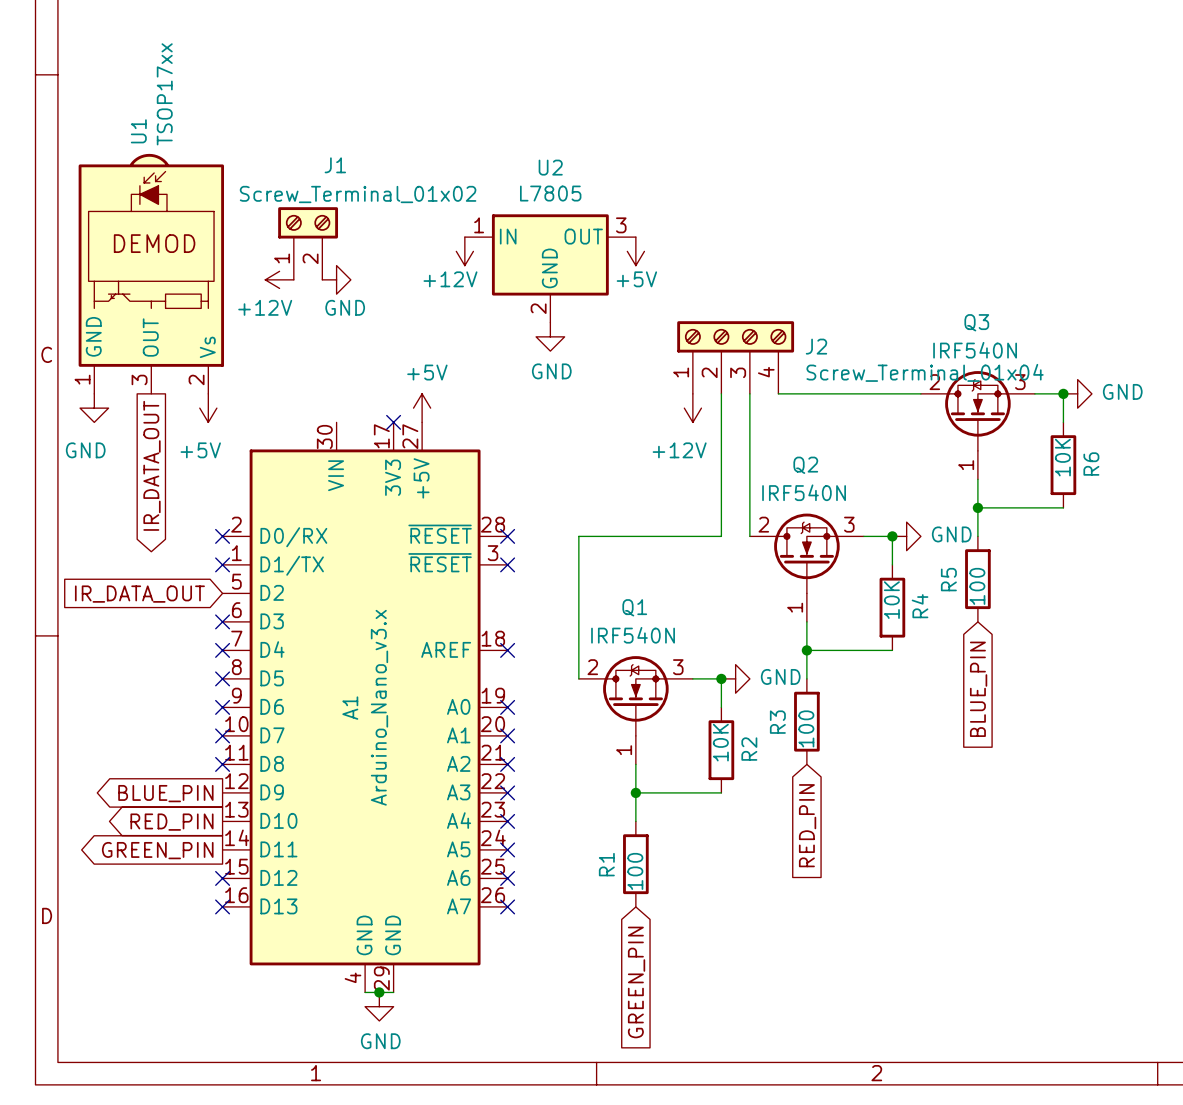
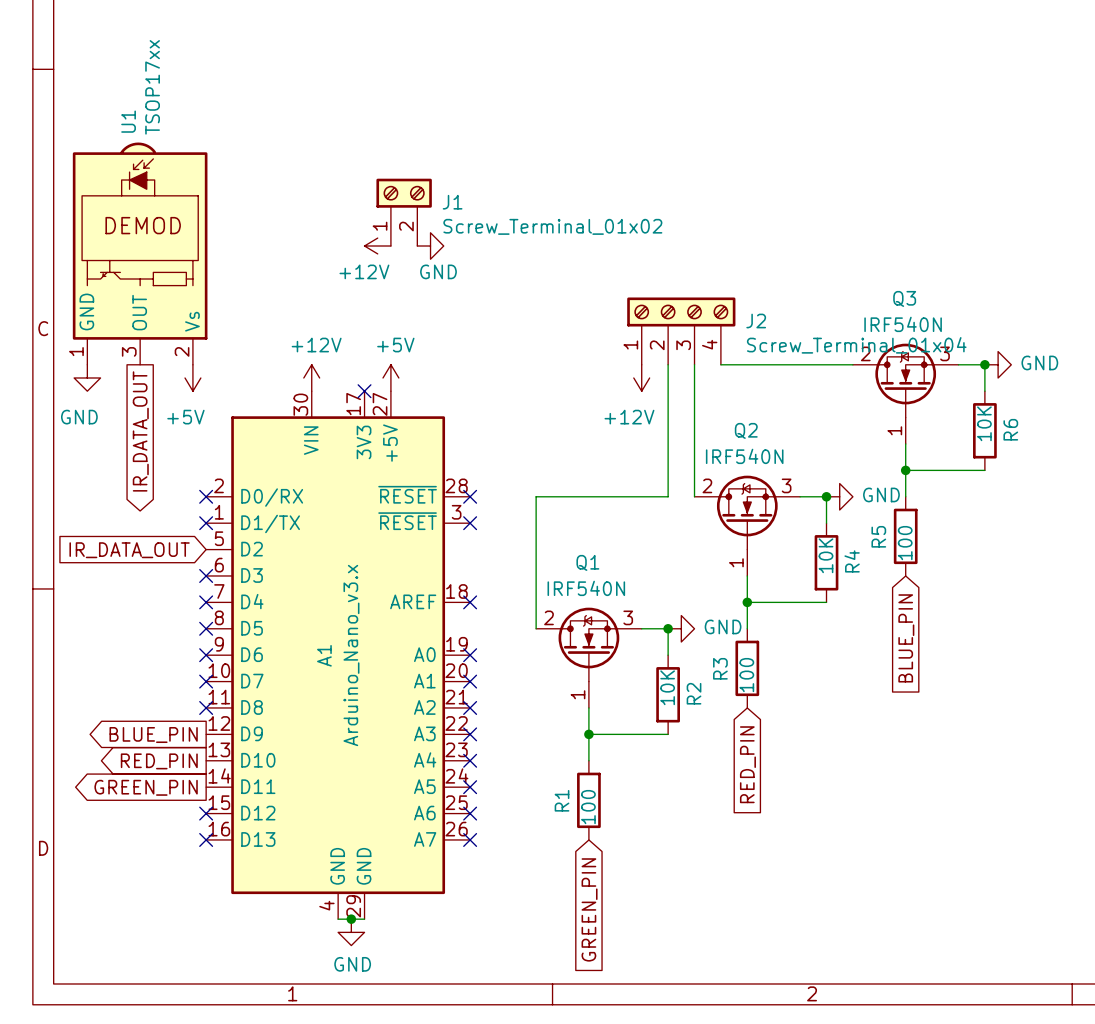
J1 name position: J1 (335, 165) -> J1 (452, 202)
J1 value position: Screw_Terminal_01x02 (358, 194) -> Screw_Terminal_01x02 (552, 226)
J1 position: (308, 243) -> (404, 212)
power symbol rotation: 0° (464, 251) -> 90° clockwise (377, 246)
power symbol position: +12V (464, 251) -> +12V (377, 246)
power symbol: +5V (635, 251) -> none
power symbol: none -> GND (430, 246)
U2: L7805 (550, 268) -> none
power symbol: +12V (279, 279) -> none
power symbol: GND (336, 279) -> none
power symbol: GND (550, 336) -> none
power symbol: none -> +12V (311, 377)

